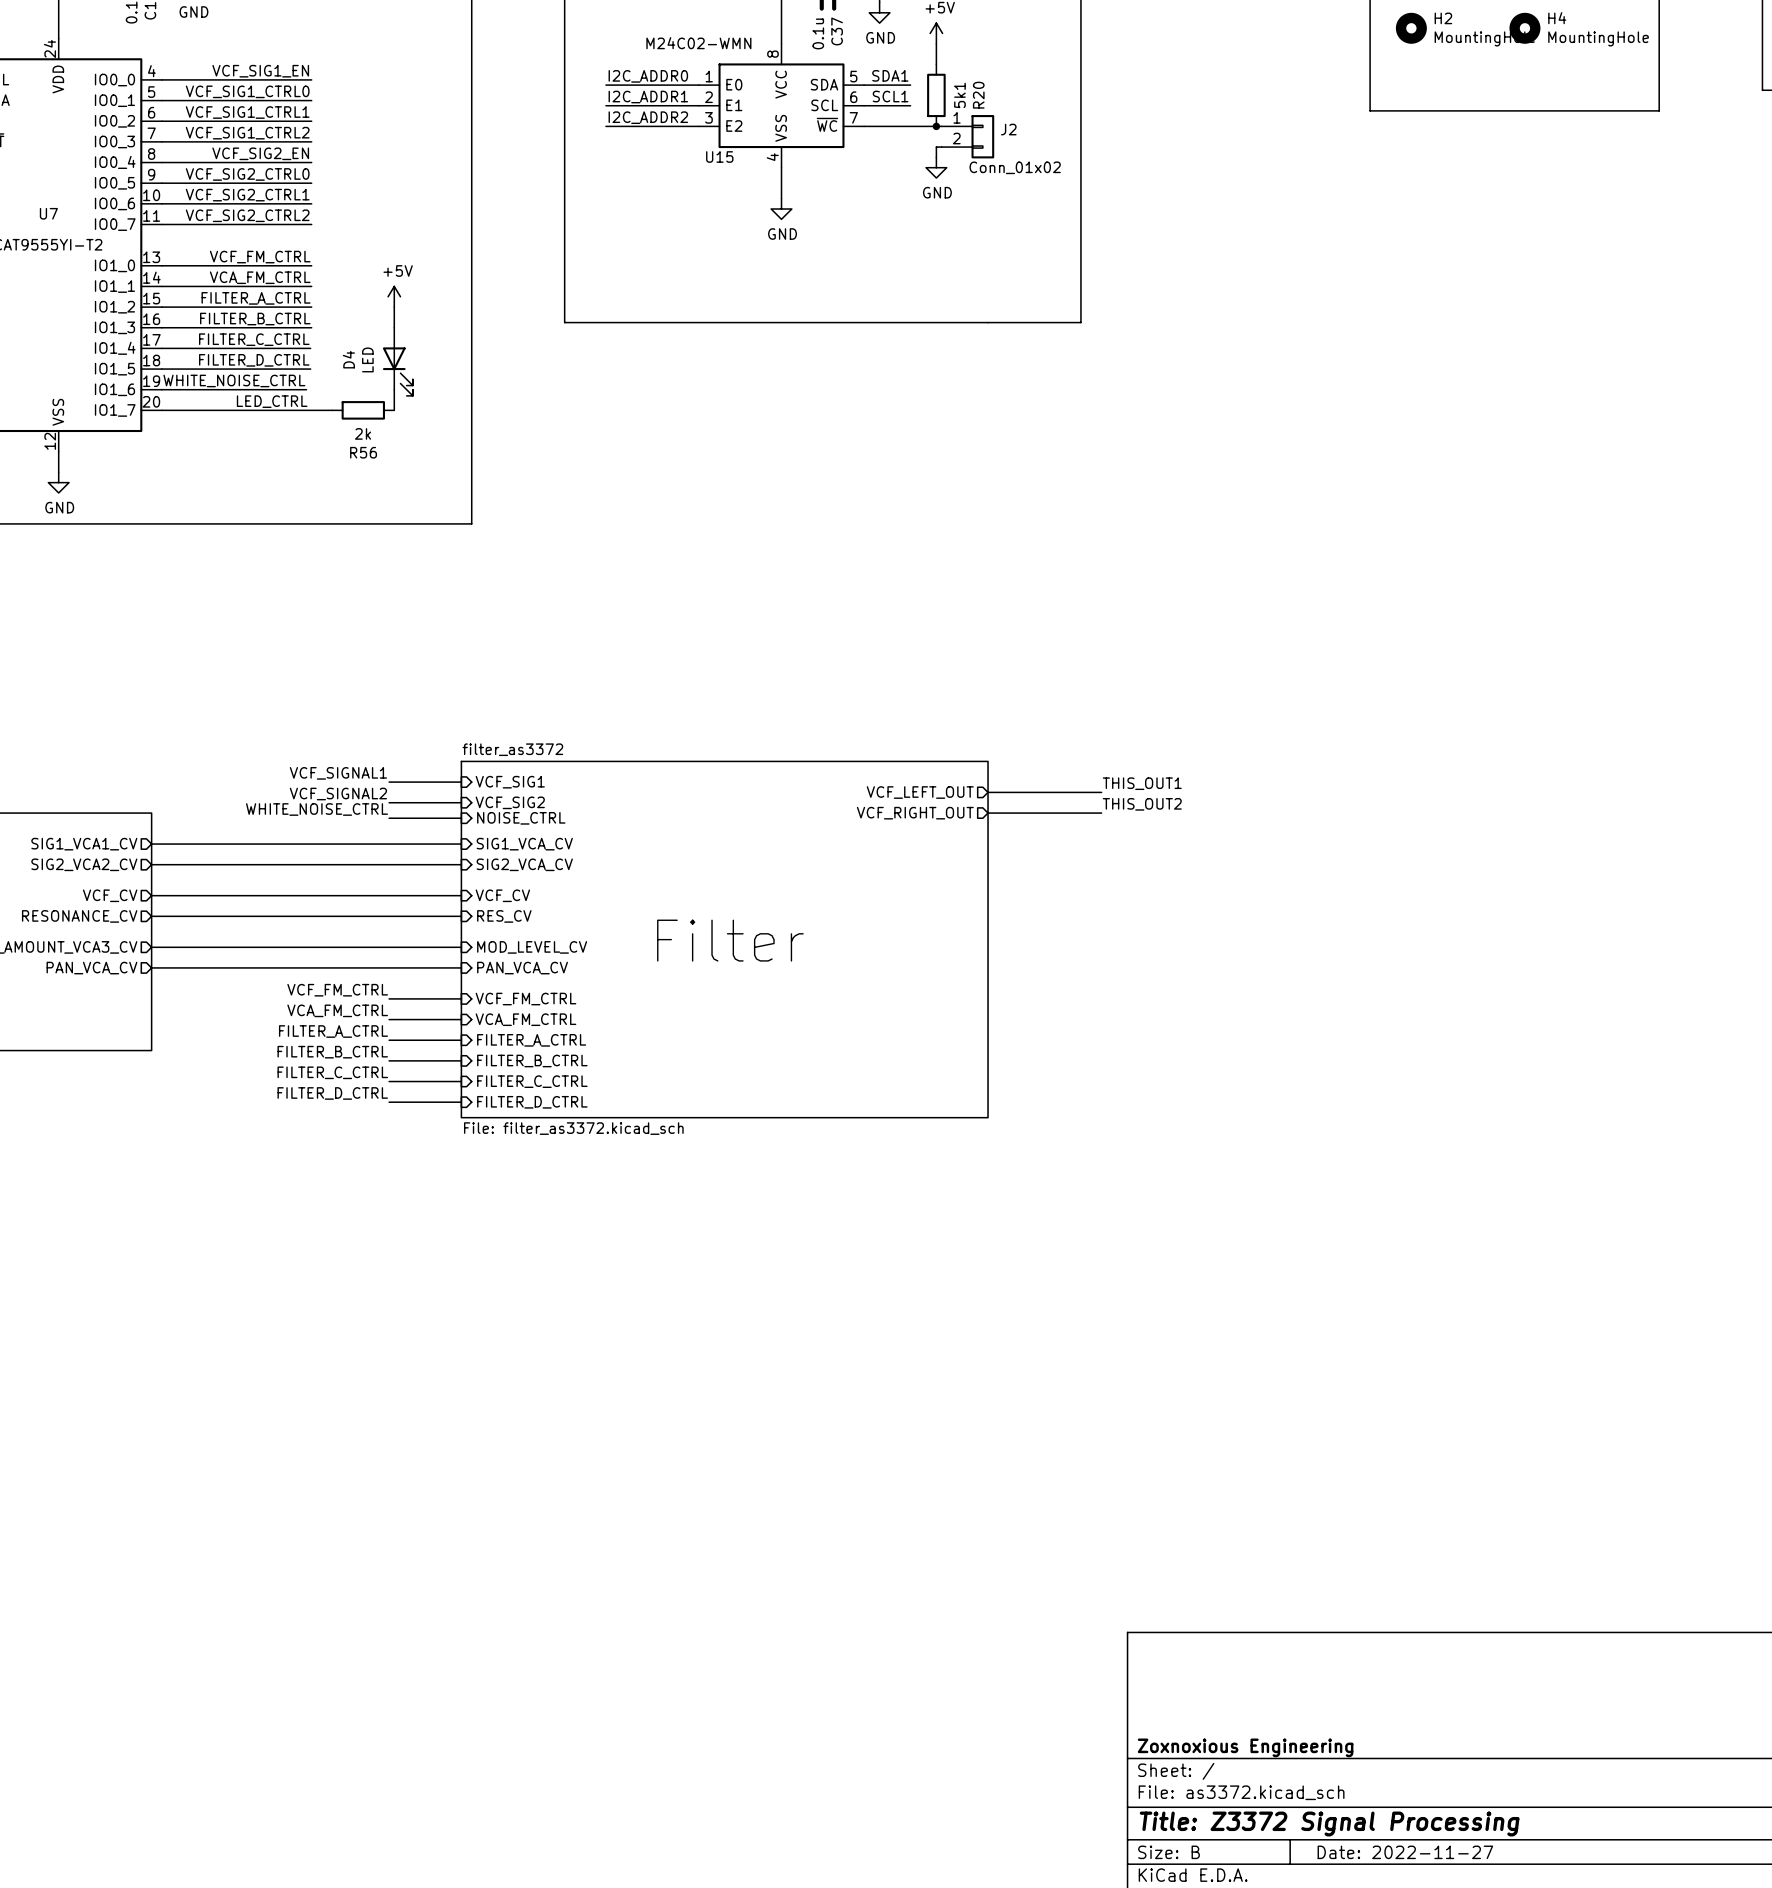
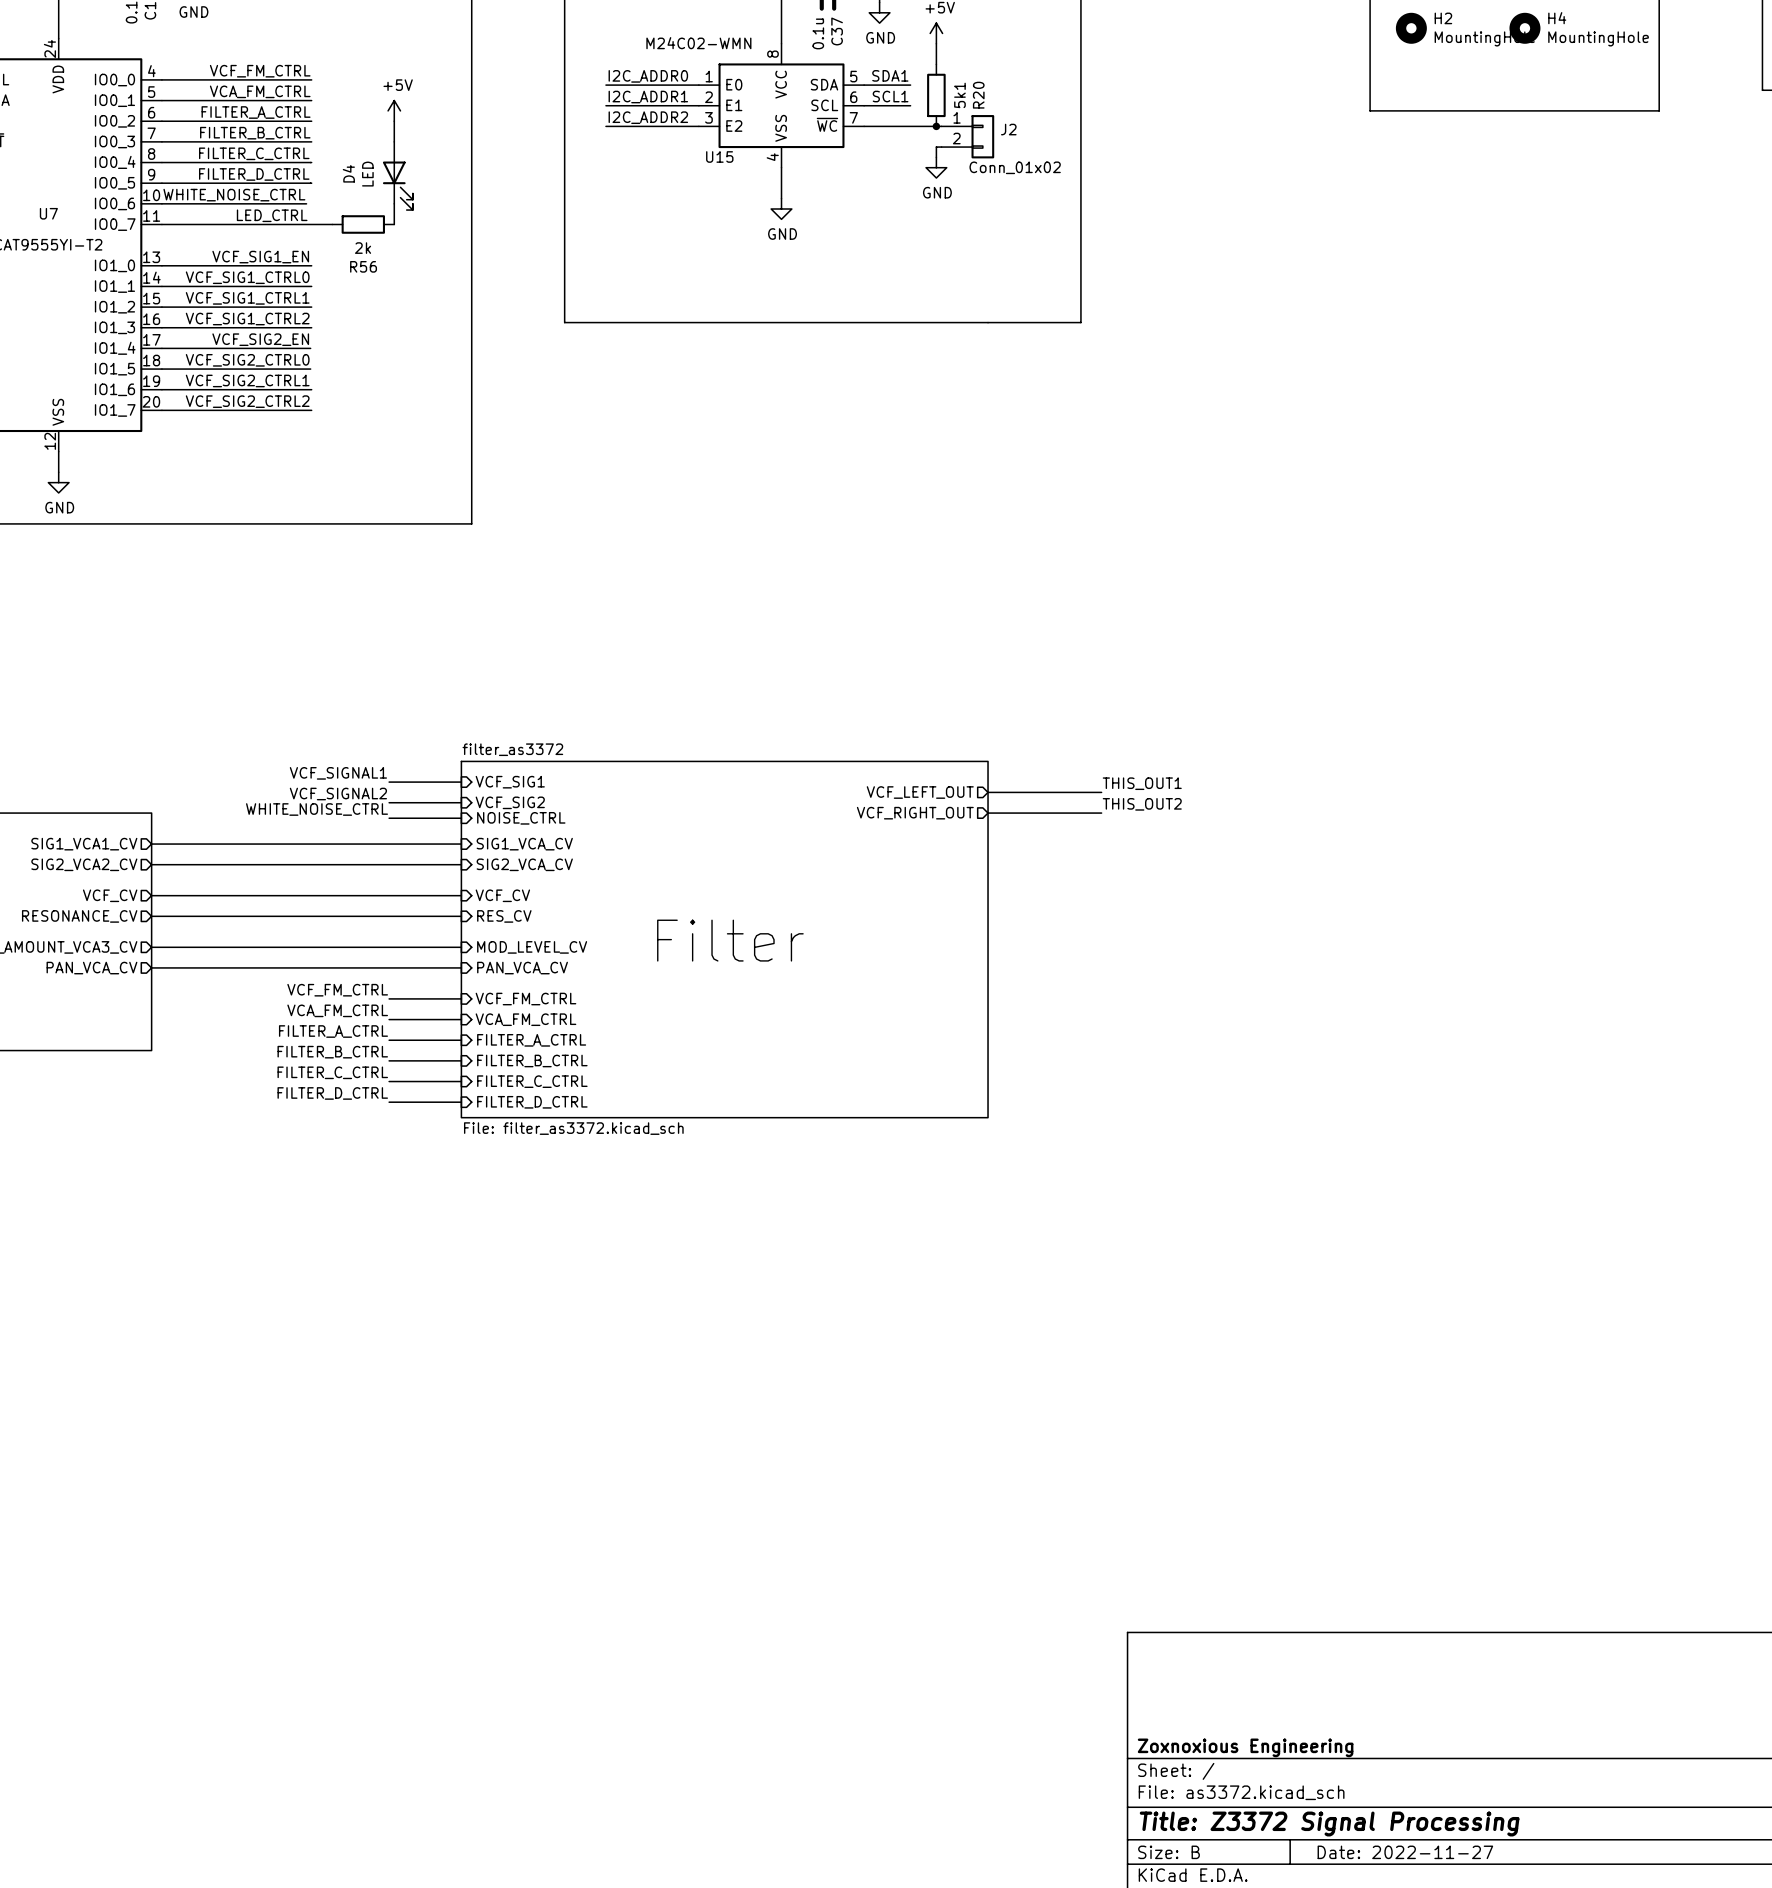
label: VCF_SIG1_EN (260, 71) -> VCF_FM_CTRL (260, 71)
label: VCF_SIG1_CTRL0 (247, 91) -> VCA_FM_CTRL (260, 91)
label: VCF_SIG1_CTRL1 (247, 112) -> FILTER_A_CTRL (256, 112)
label: VCF_SIG1_CTRL2 (247, 133) -> FILTER_B_CTRL (255, 133)
label position: VCF_SIG2_EN (260, 153) -> VCF_SIG2_EN (260, 339)
label position: VCF_SIG2_CTRL0 (247, 174) -> VCF_SIG2_CTRL0 (247, 360)
label position: VCF_SIG2_CTRL1 (247, 195) -> VCF_SIG2_CTRL1 (247, 380)
wire: (306, 203) (311, 203) -> (306, 389) (311, 389)
label position: VCF_SIG2_CTRL2 (247, 215) -> VCF_SIG2_CTRL2 (247, 401)
label: VCF_FM_CTRL (260, 257) -> VCF_SIG1_EN (260, 257)
label: VCA_FM_CTRL (260, 277) -> VCF_SIG1_CTRL0 (247, 277)
power symbol position: +5V (394, 296) -> +5V (394, 110)
label: FILTER_A_CTRL (256, 298) -> VCF_SIG1_CTRL1 (247, 298)
wire: (394, 307) (394, 327) -> (394, 121) (394, 141)
label: FILTER_B_CTRL (255, 319) -> VCF_SIG1_CTRL2 (247, 319)
label position: FILTER_C_CTRL (254, 339) -> FILTER_C_CTRL (254, 153)
label position: FILTER_D_CTRL (254, 360) -> FILTER_D_CTRL (254, 174)
D4 position: (397, 361) -> (397, 175)
label position: WHITE_NOISE_CTRL (234, 380) -> WHITE_NOISE_CTRL (234, 195)
wire: (394, 389) (394, 410) -> (394, 203) (394, 224)
label position: LED_CTRL (272, 401) -> LED_CTRL (272, 215)
wire: (311, 410) (332, 410) -> (311, 224) (332, 224)
R56 position: (363, 410) -> (363, 224)

